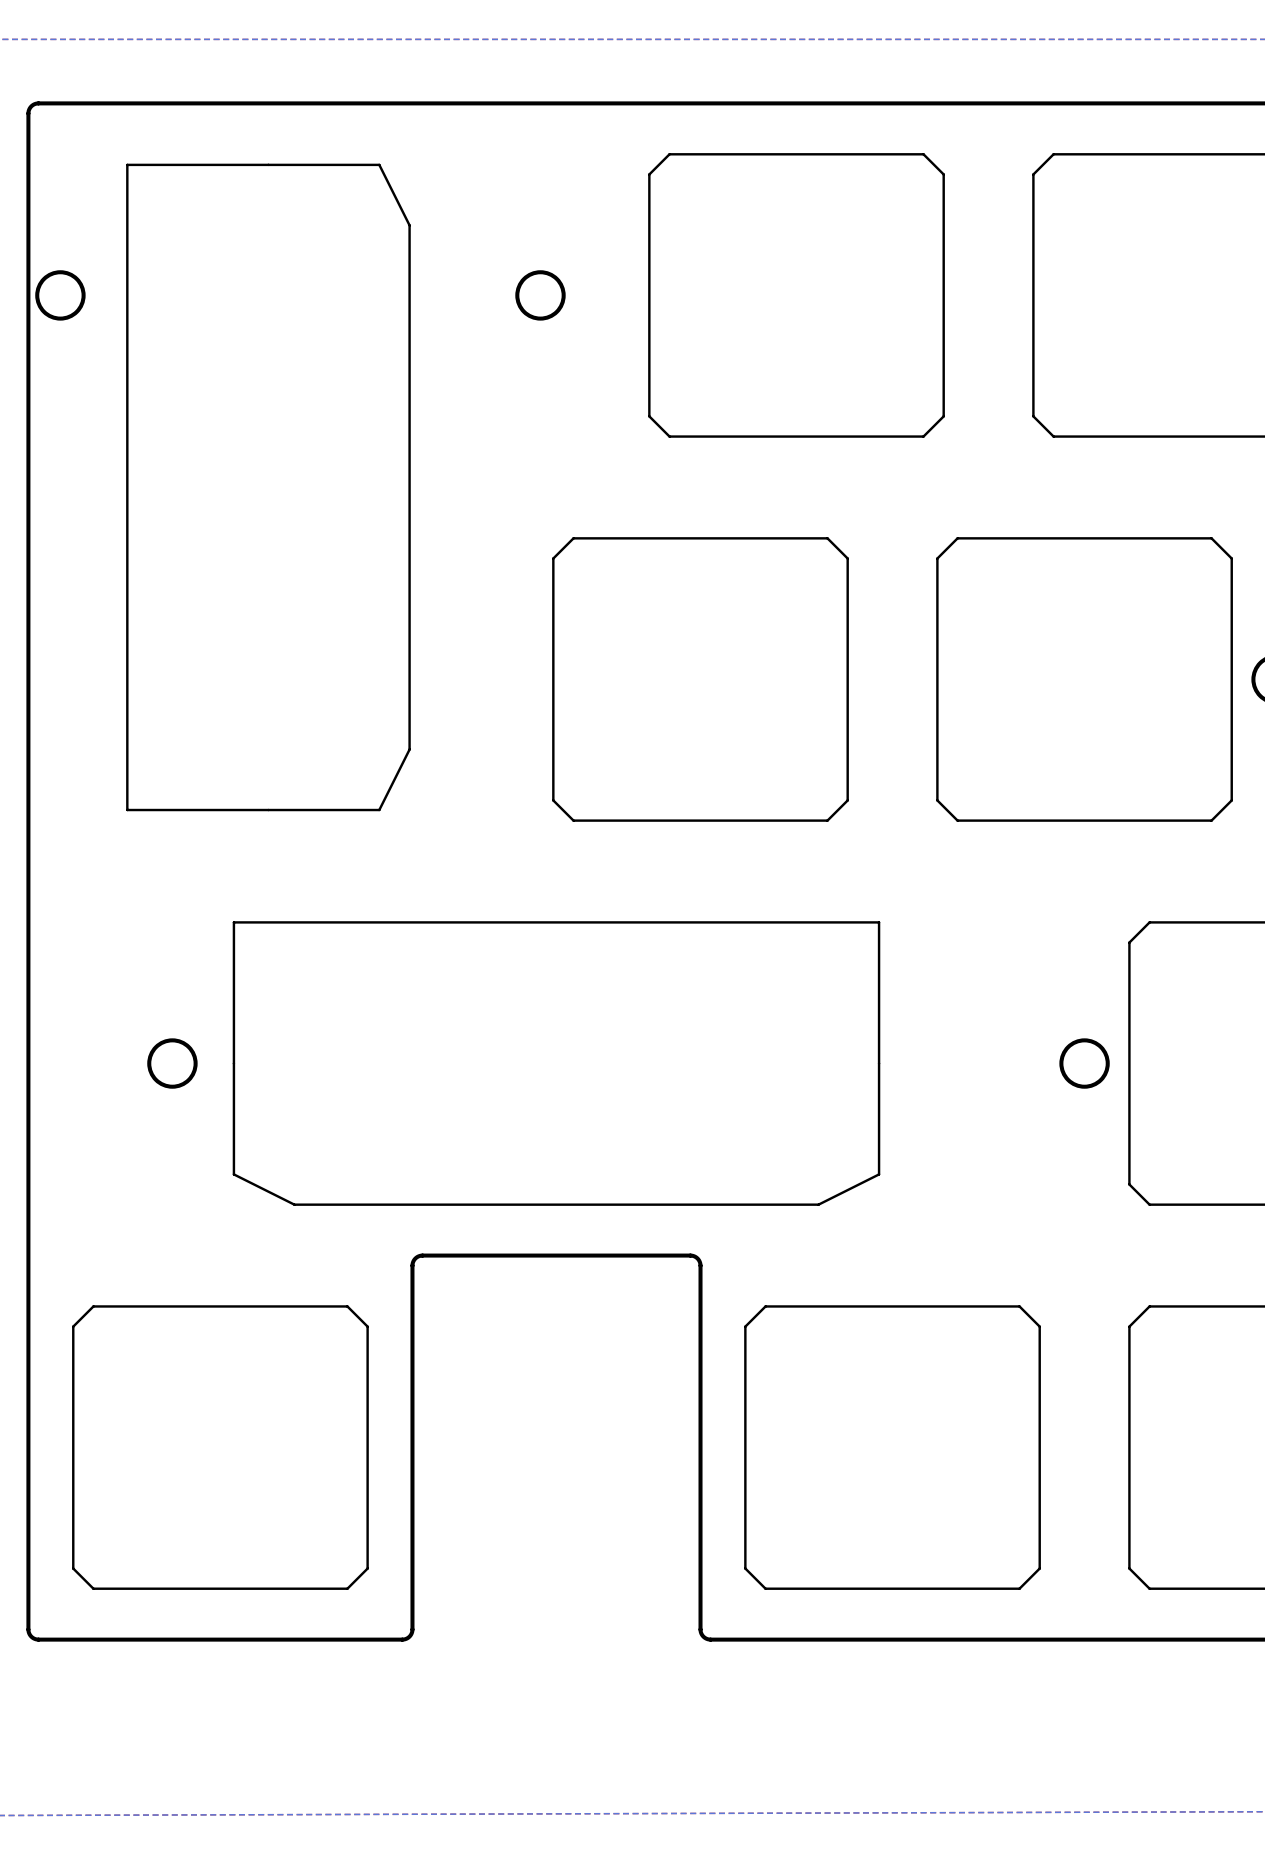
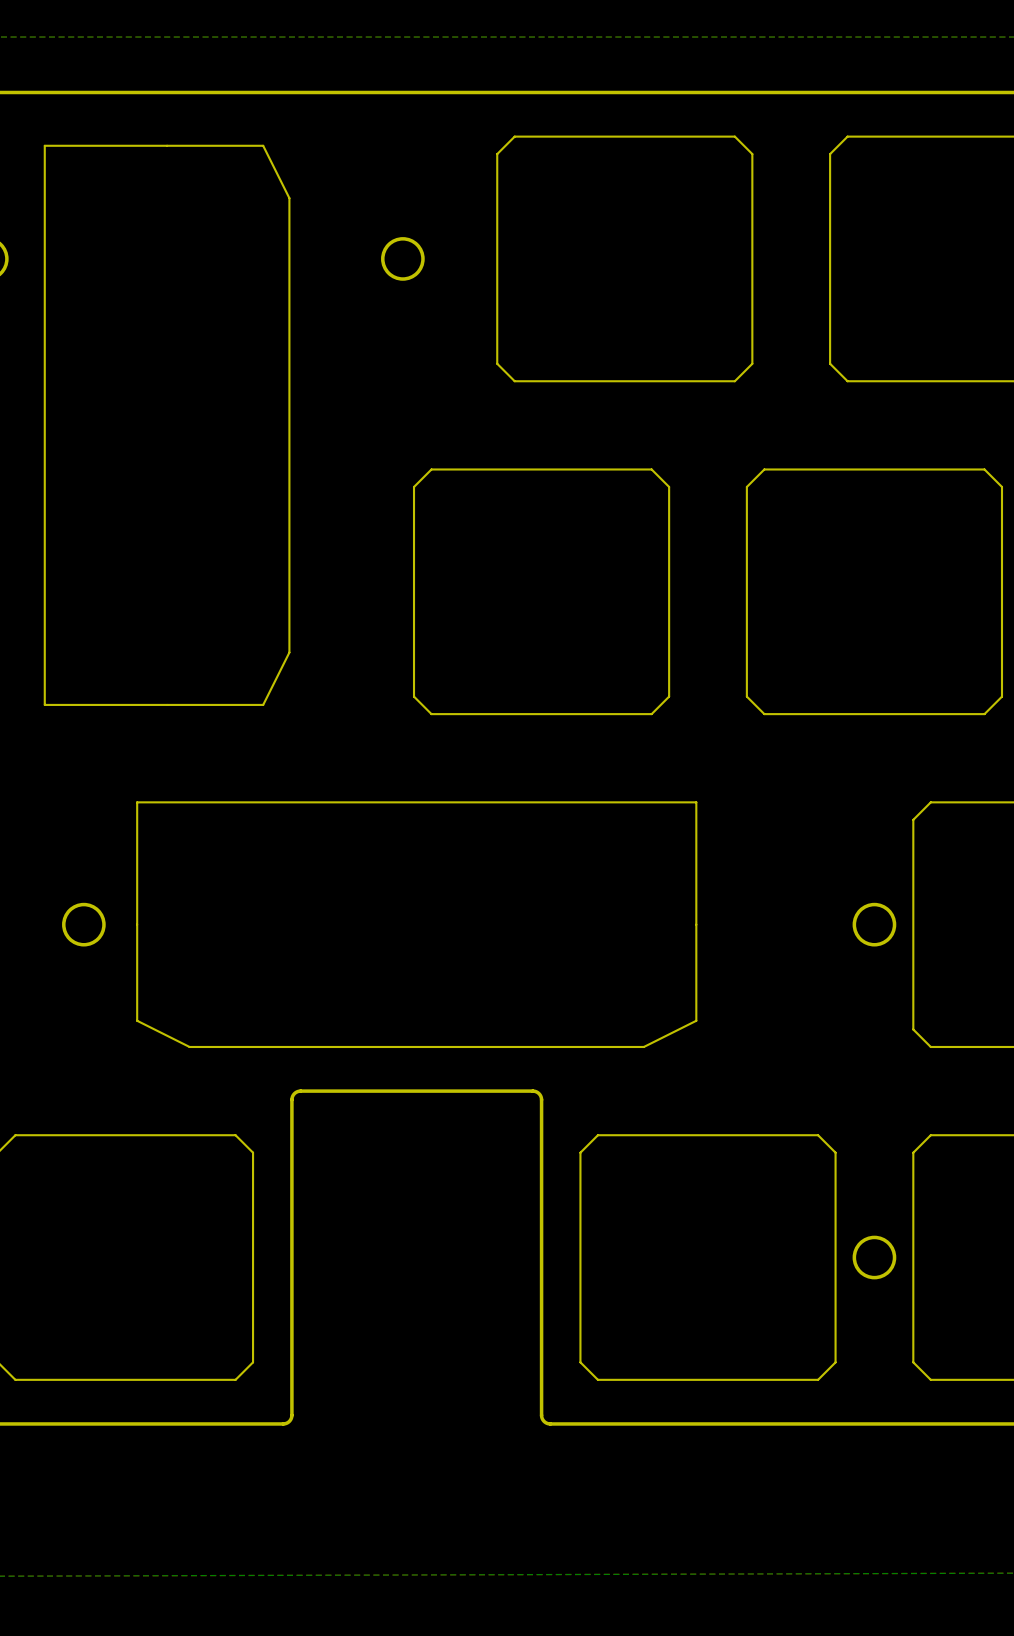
round board edge: none -> [852, 1235, 897, 1280]

